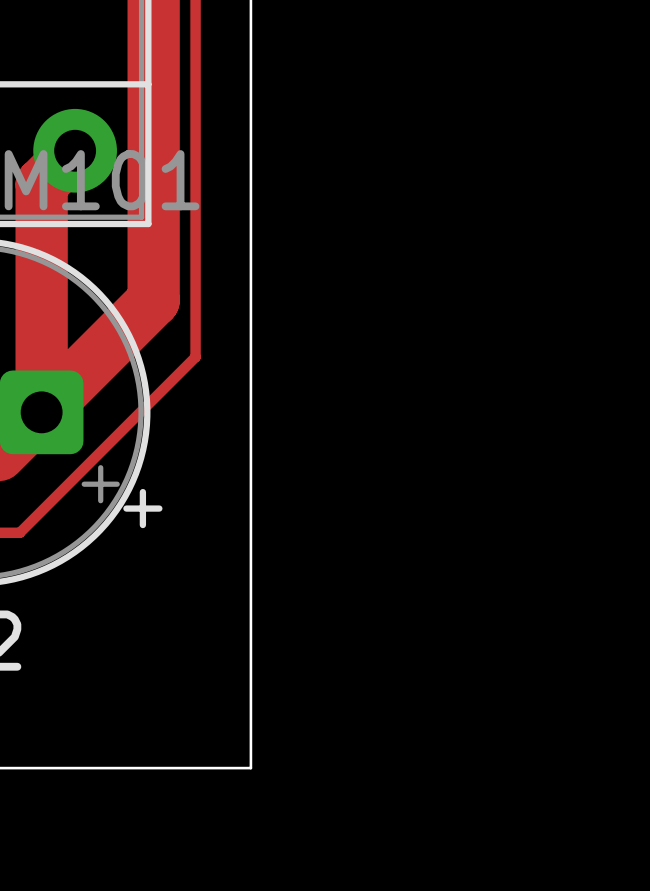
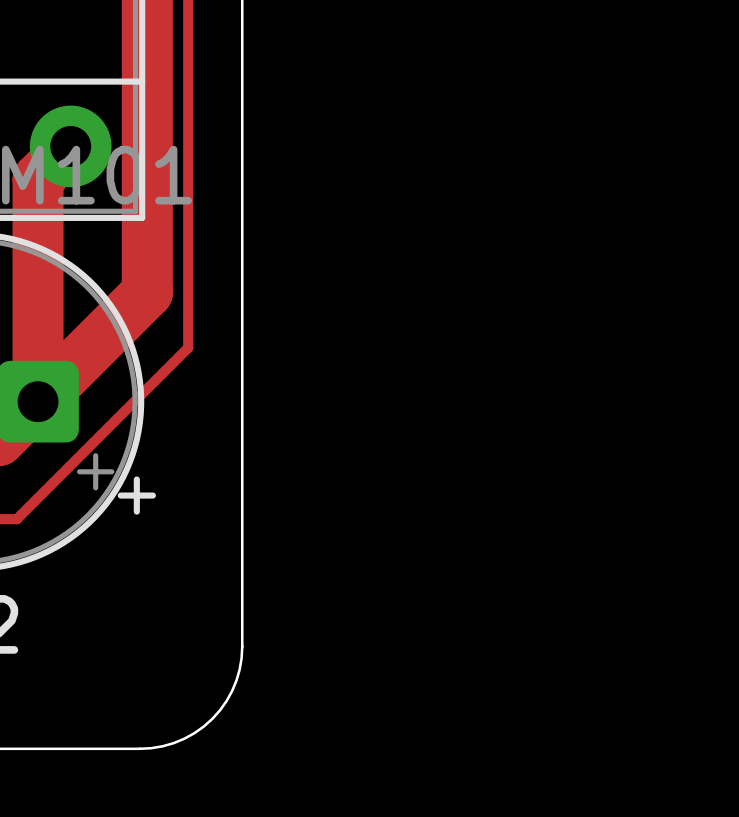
board edge: (250, 663) (250, 768) (146, 768) -> (242, 646) (236, 680) (226, 701) (212, 718) (194, 733) (173, 743) (140, 748)

